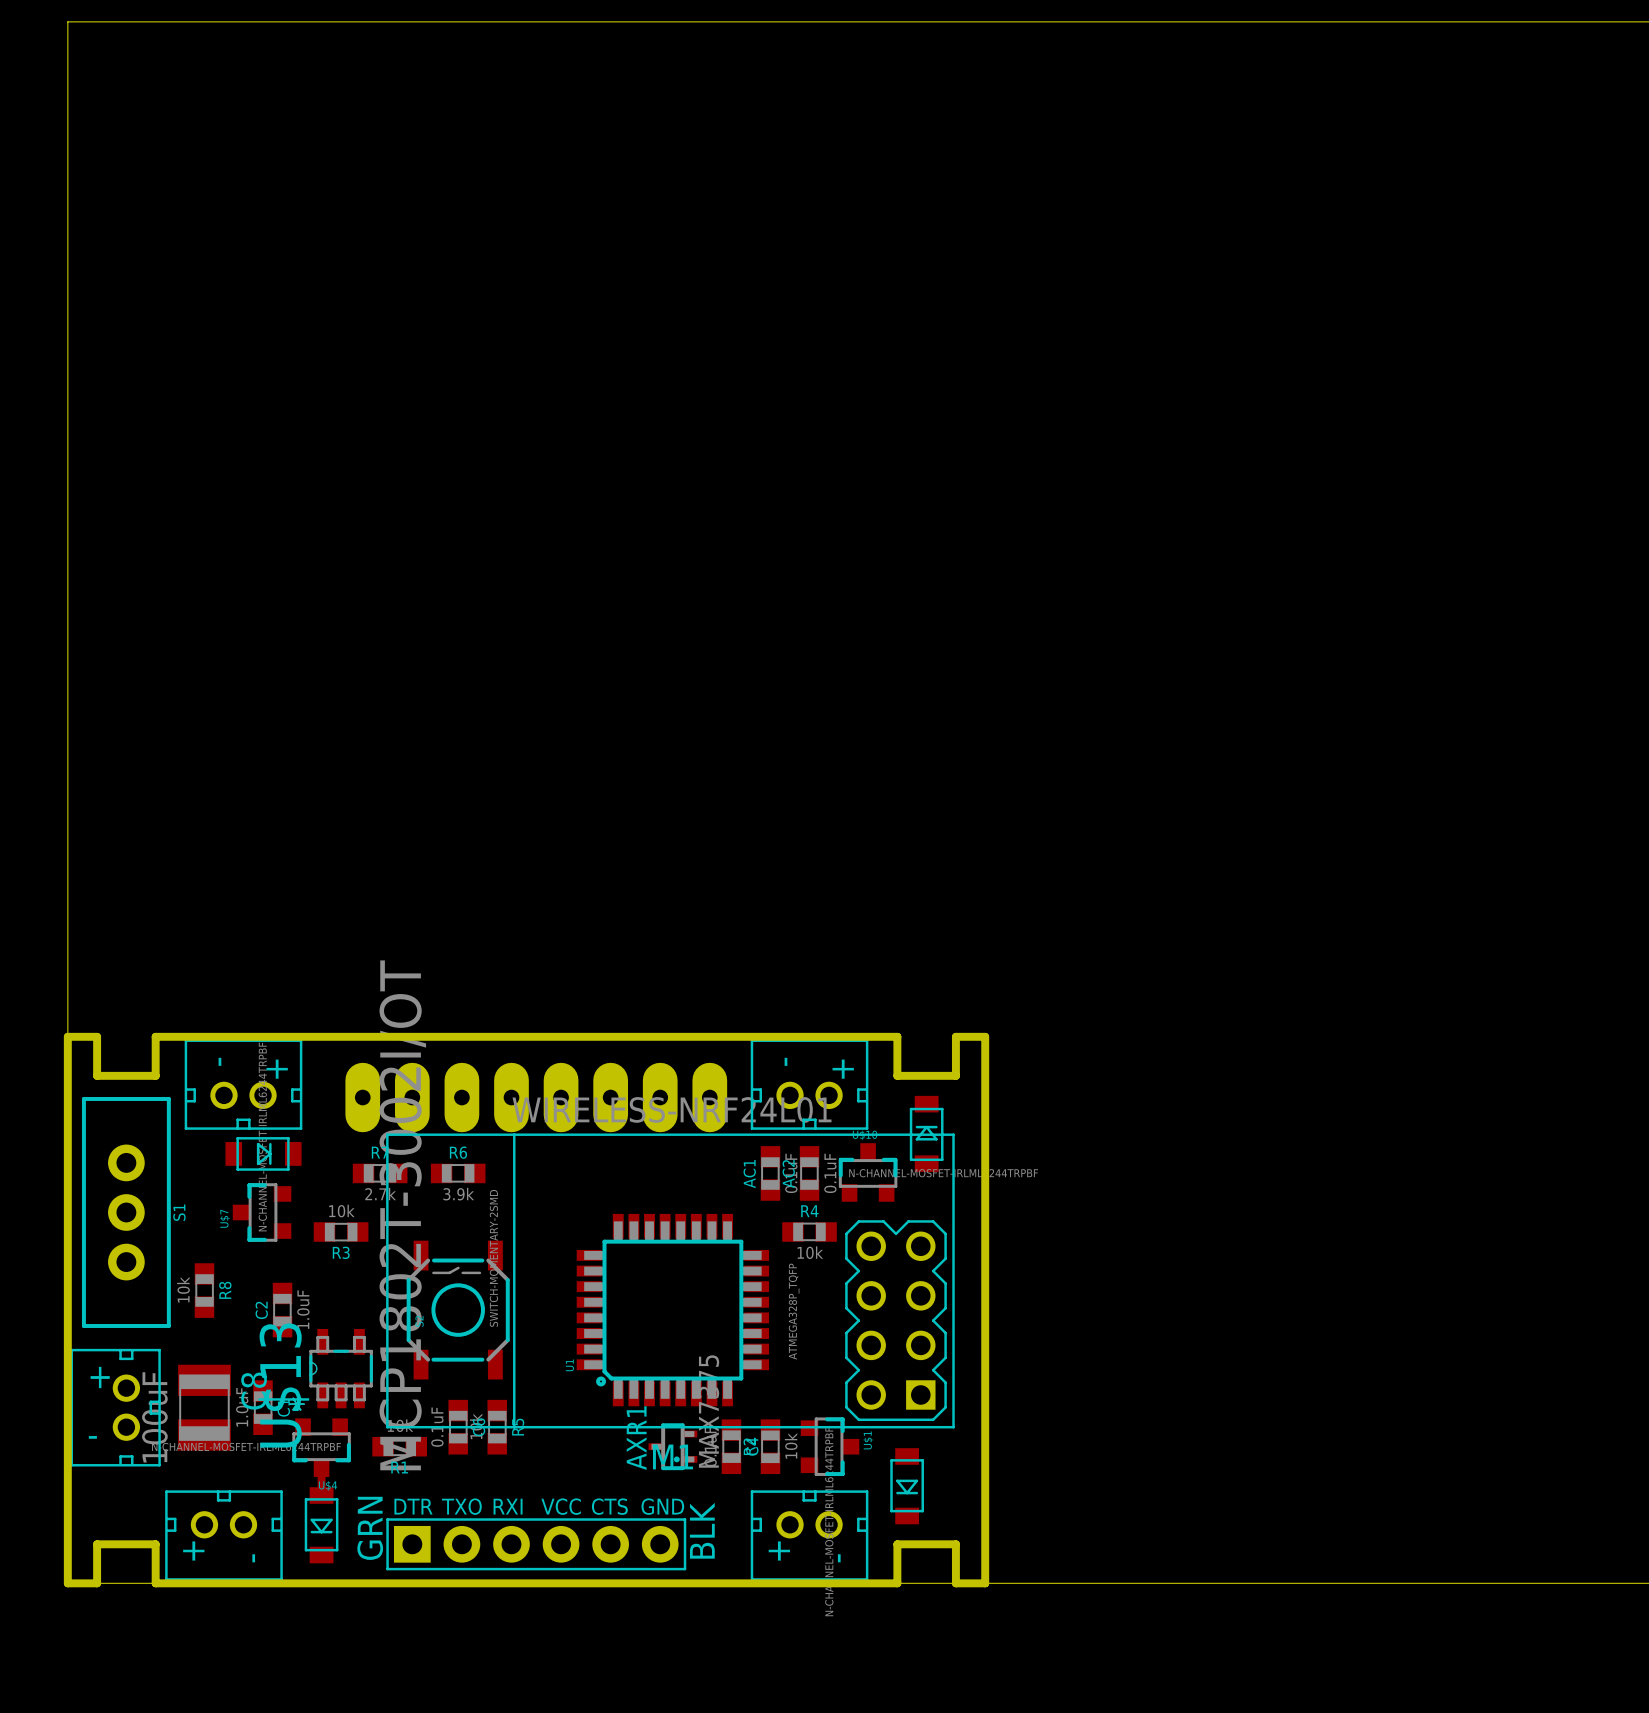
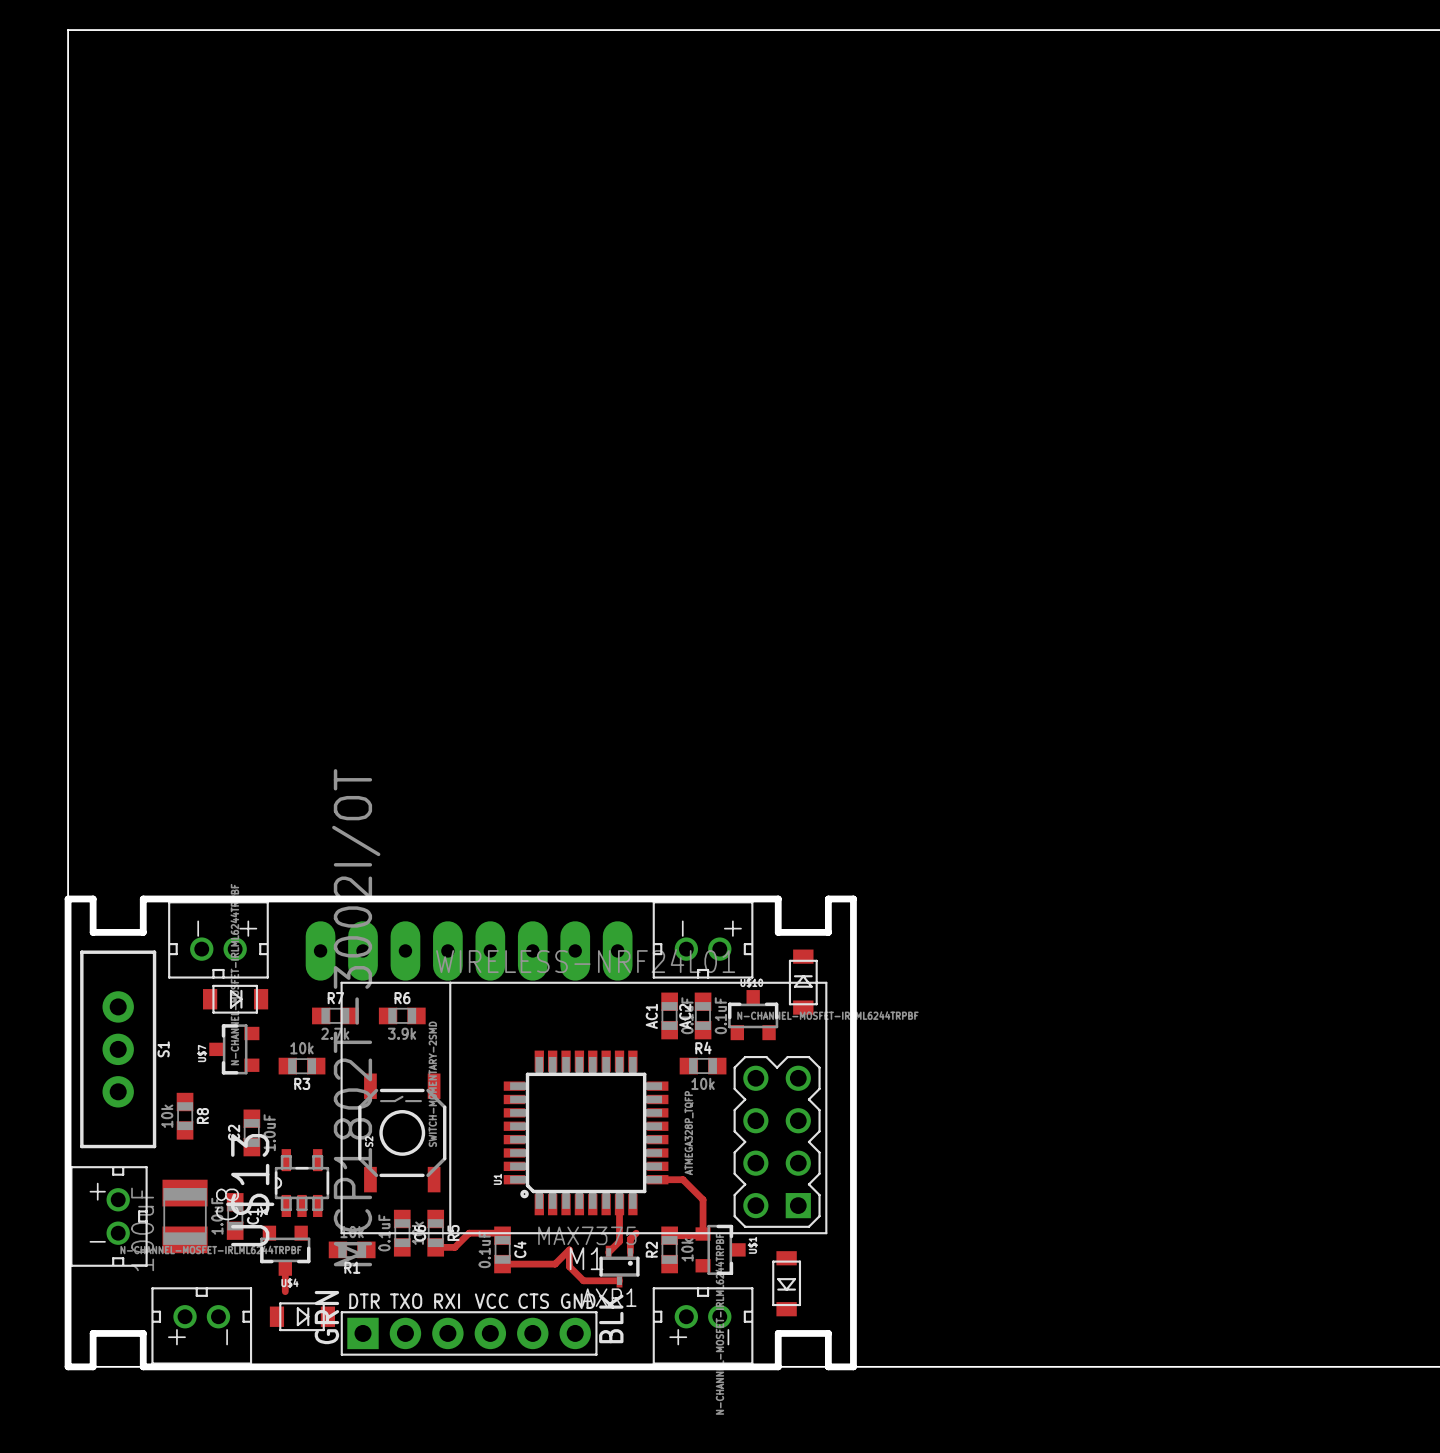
top track: none -> (657, 1179) (683, 1179) (703, 1199) (703, 1235) (669, 1235)
top track: none -> (619, 1204) (619, 1241) (608, 1252)
top track: none -> (636, 1233) (630, 1239) (630, 1252)
top track: none -> (502, 1235) (500, 1233) (469, 1233) (454, 1247) (435, 1247)
AXR1 rotation: 0° (672, 1446) -> 90° counterclockwise (619, 1266)
AXR1 position: (672, 1446) -> (619, 1266)
C4 position: (731, 1446) -> (502, 1249)
top track: none -> (502, 1264) (555, 1264) (569, 1249) (569, 1266) (583, 1280) (619, 1280)
part rotation: 0° (321, 1525) -> 90° counterclockwise (302, 1316)

